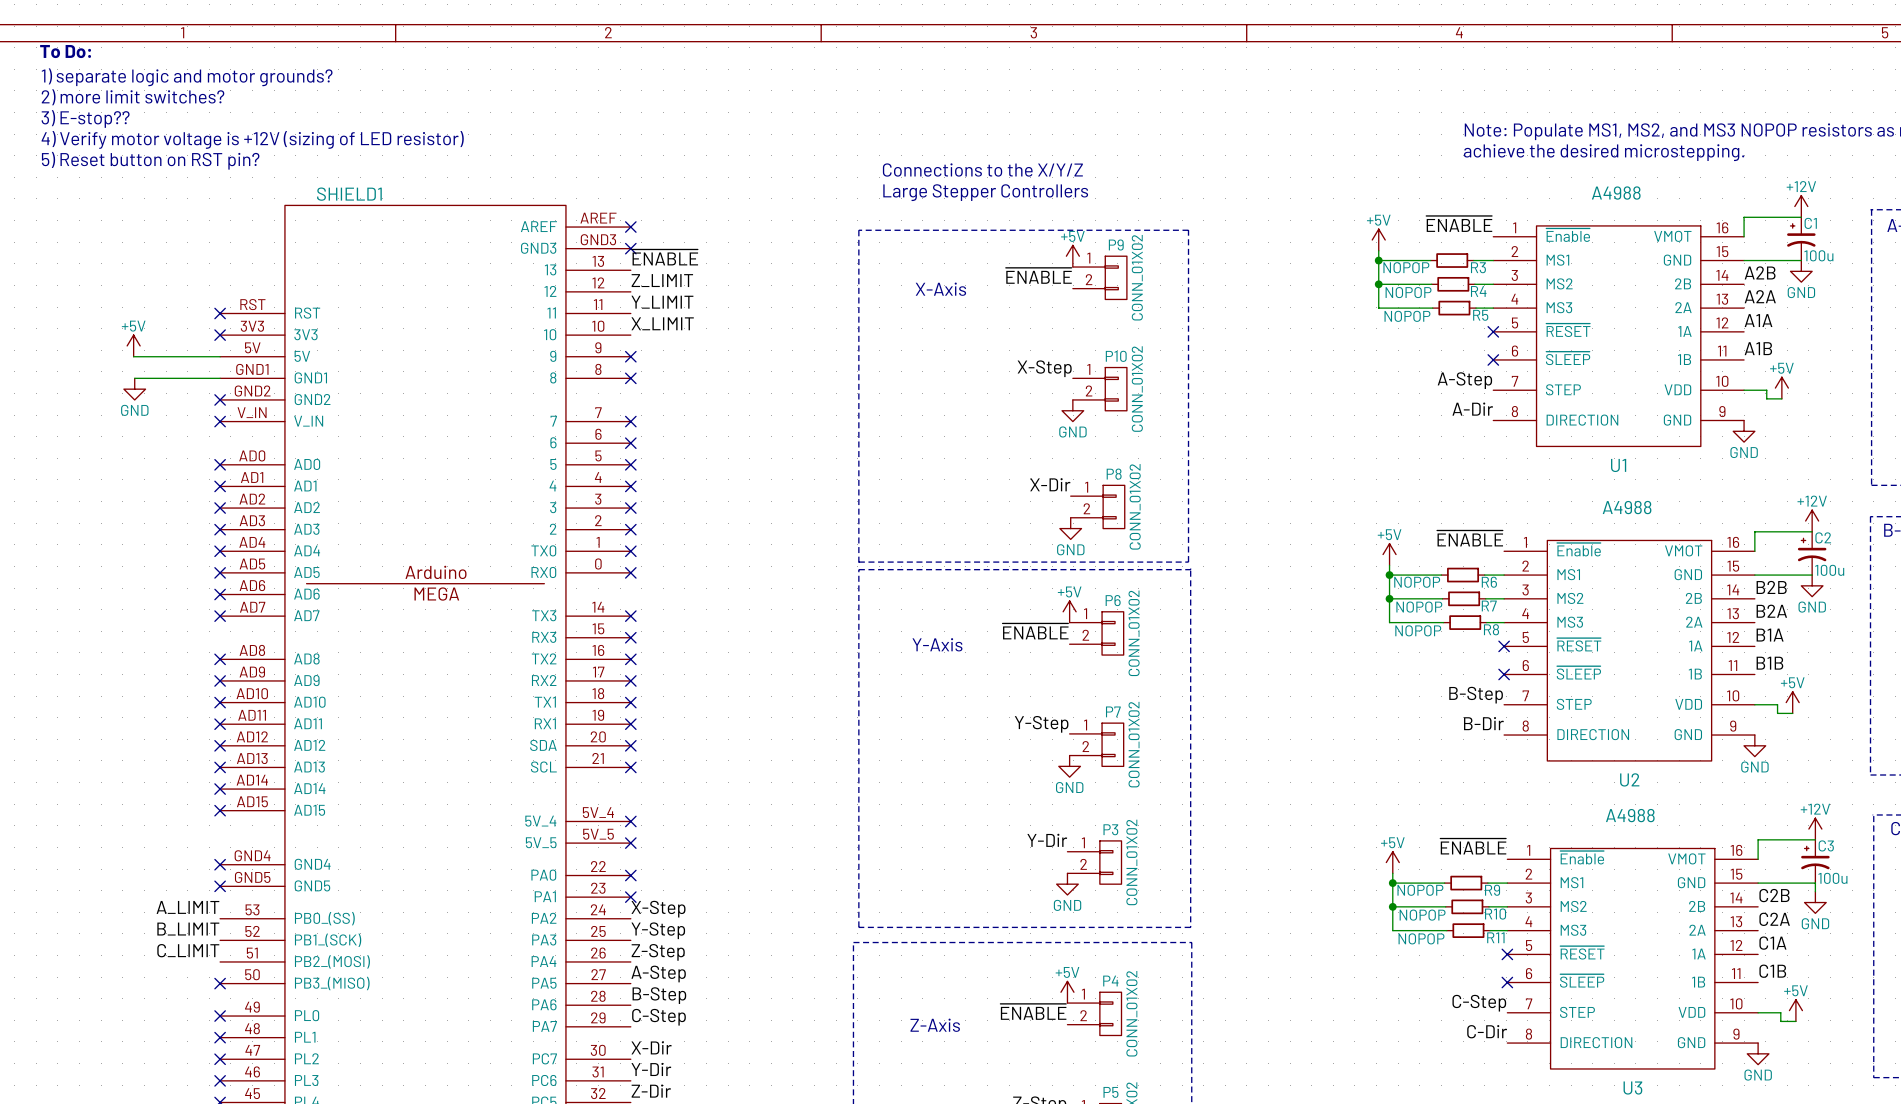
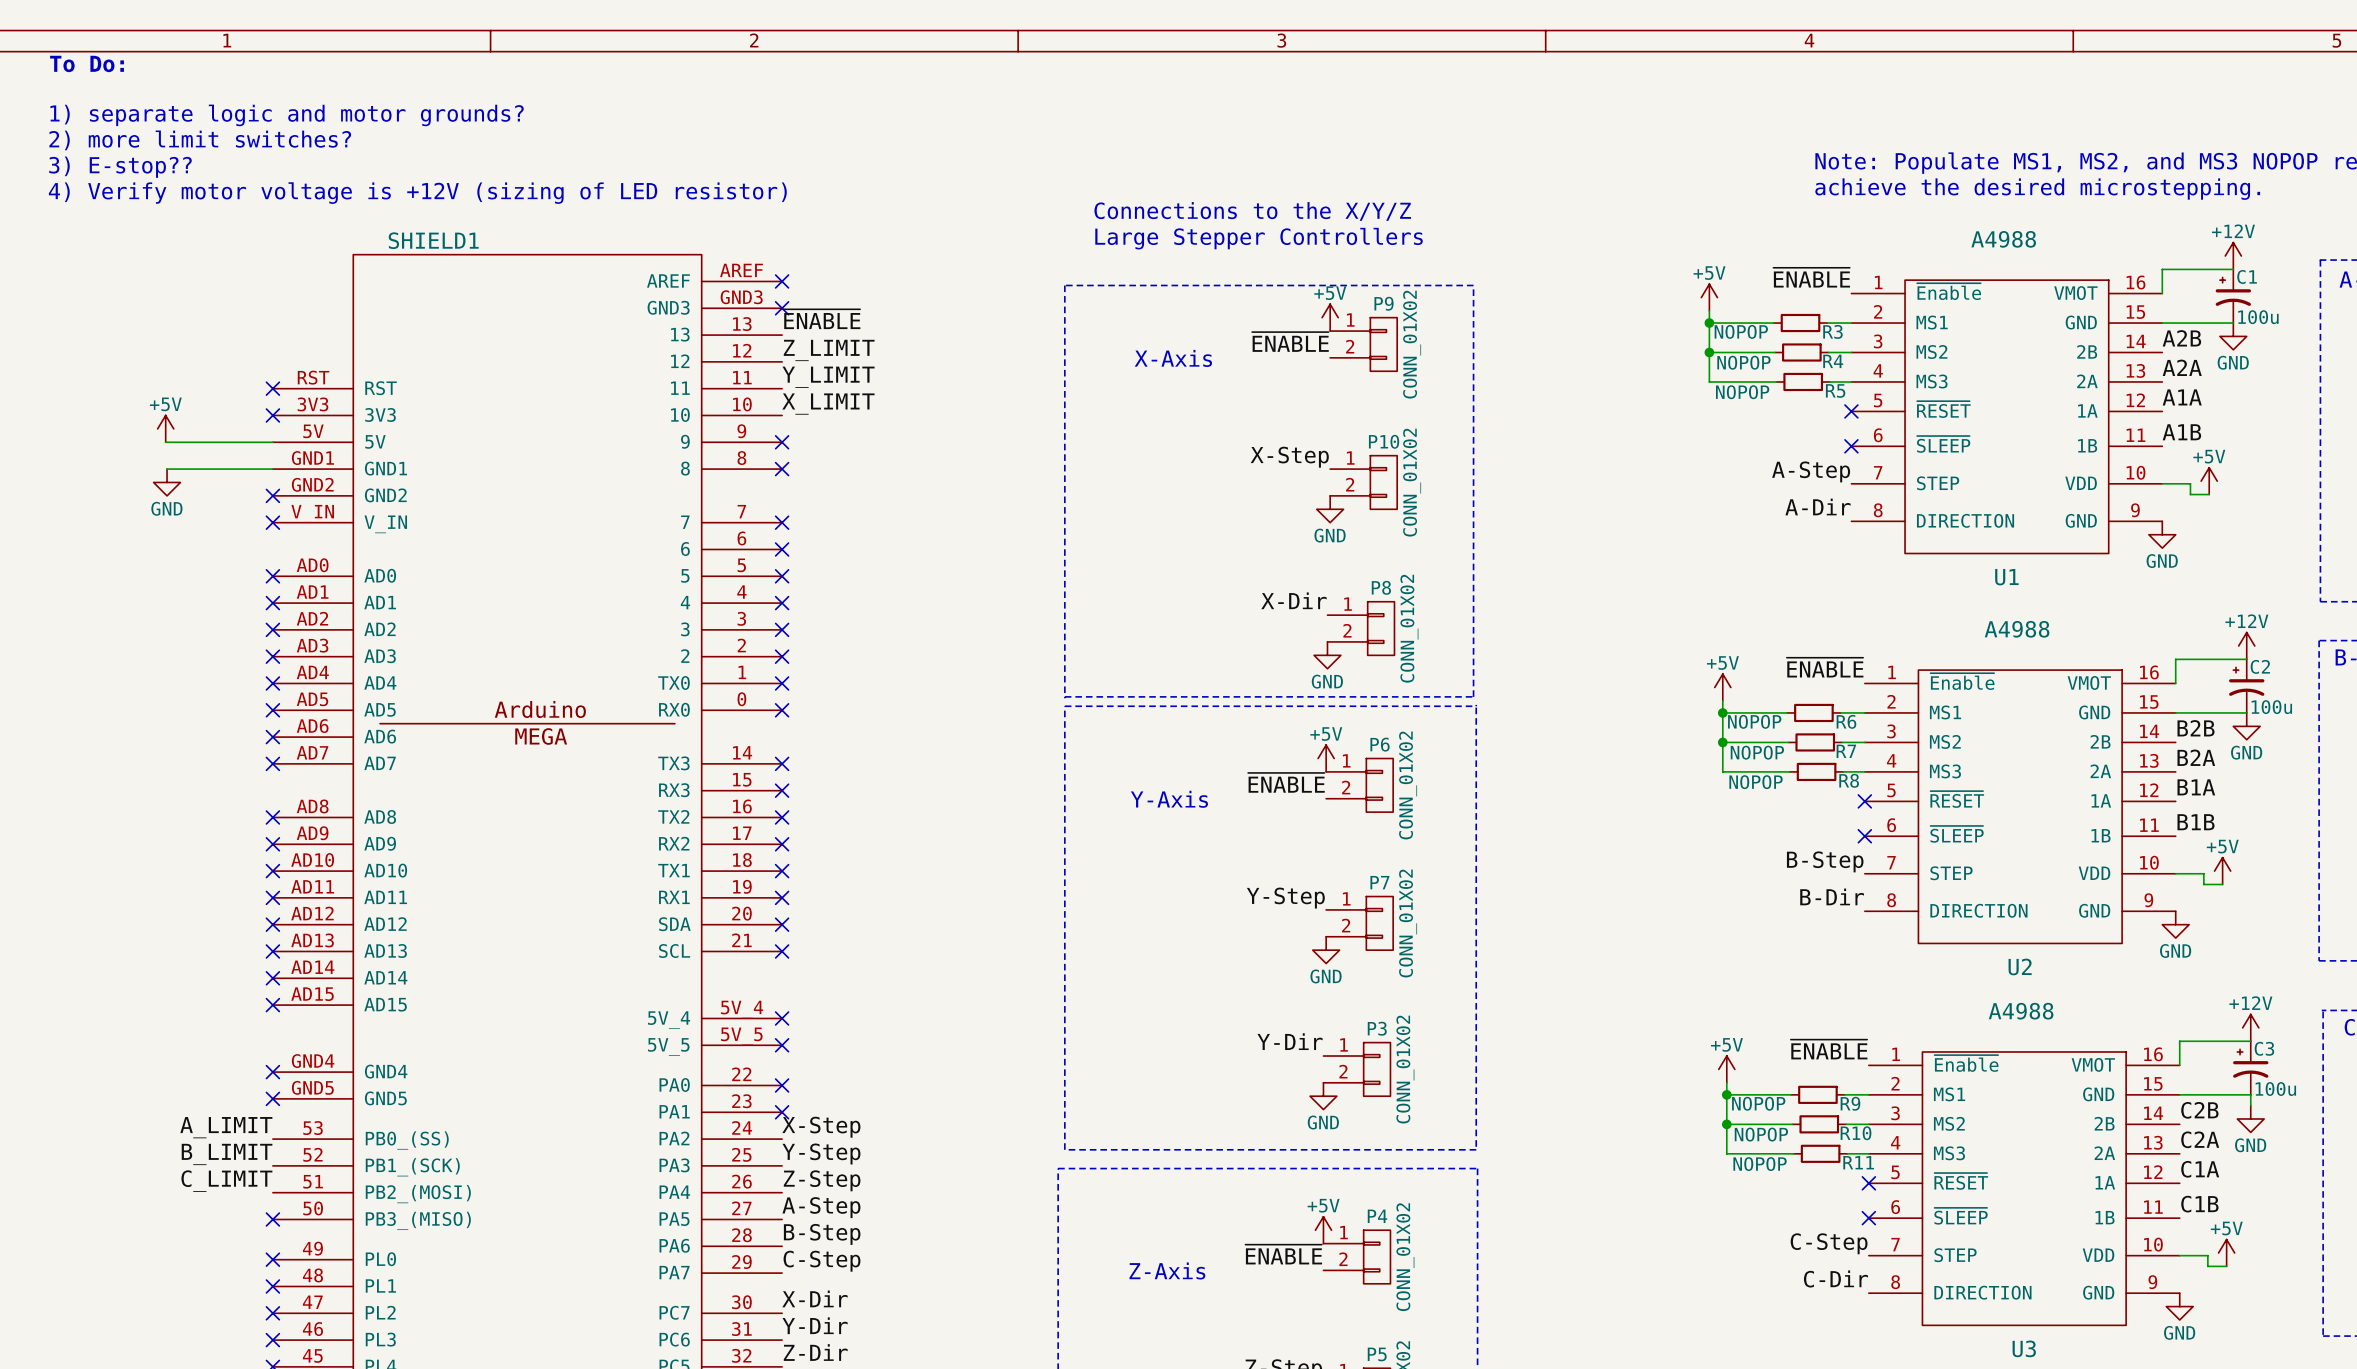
text: 1) separate logic and motor grounds? (187, 77) -> none
text: 2) more limit switches? (133, 97) -> 1) separate logic and motor grounds? (287, 115)
text: 3) E-stop?? (85, 119) -> 2) more limit switches? (200, 140)
text: 4) Verify motor voltage is +12V (sizing of LED resistor) (252, 139) -> 3) E-stop?? (120, 167)
text: 5) Reset button on RST pin? (150, 160) -> 4) Verify motor voltage is +12V (sizing of LED resistor) (417, 193)

